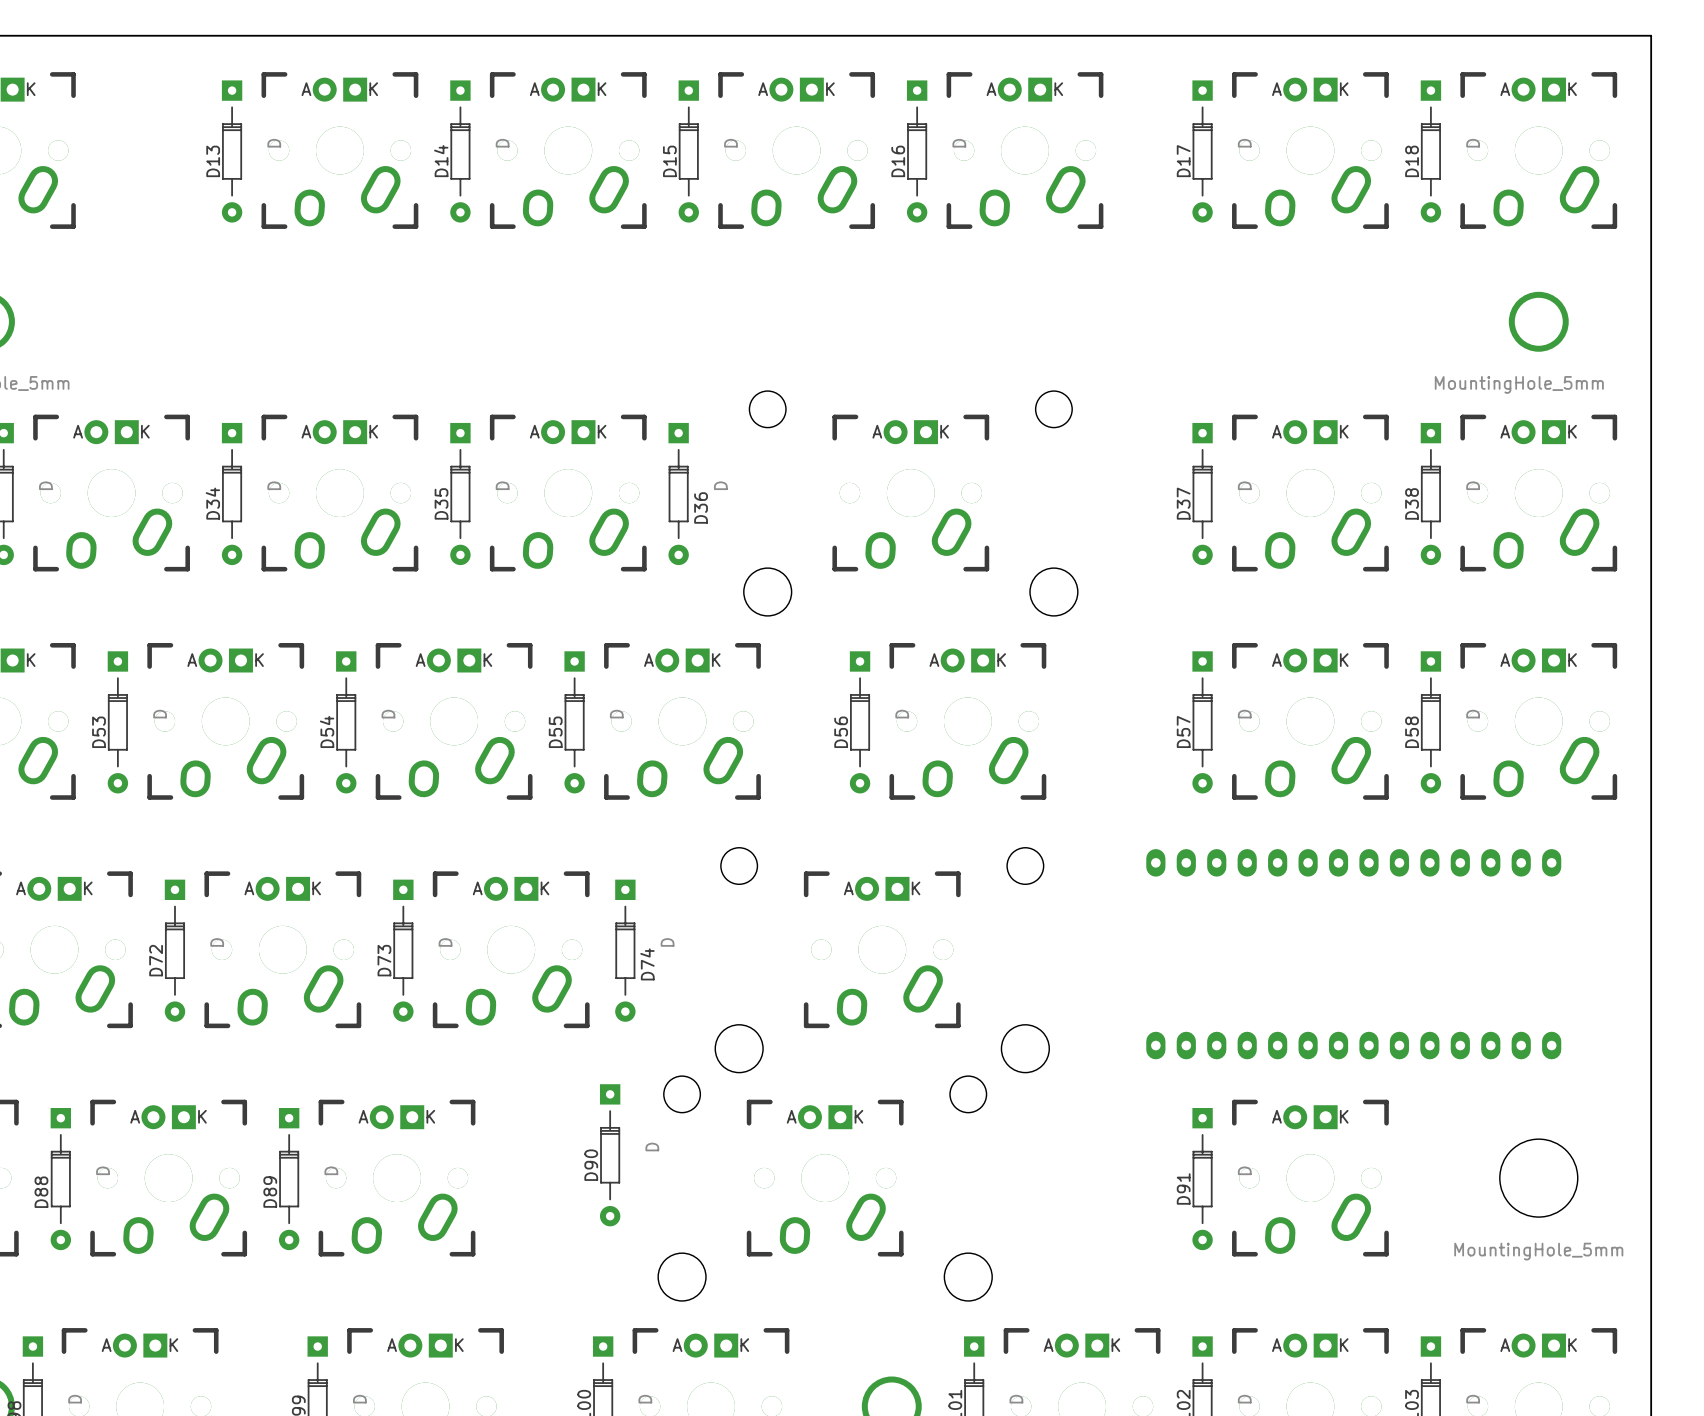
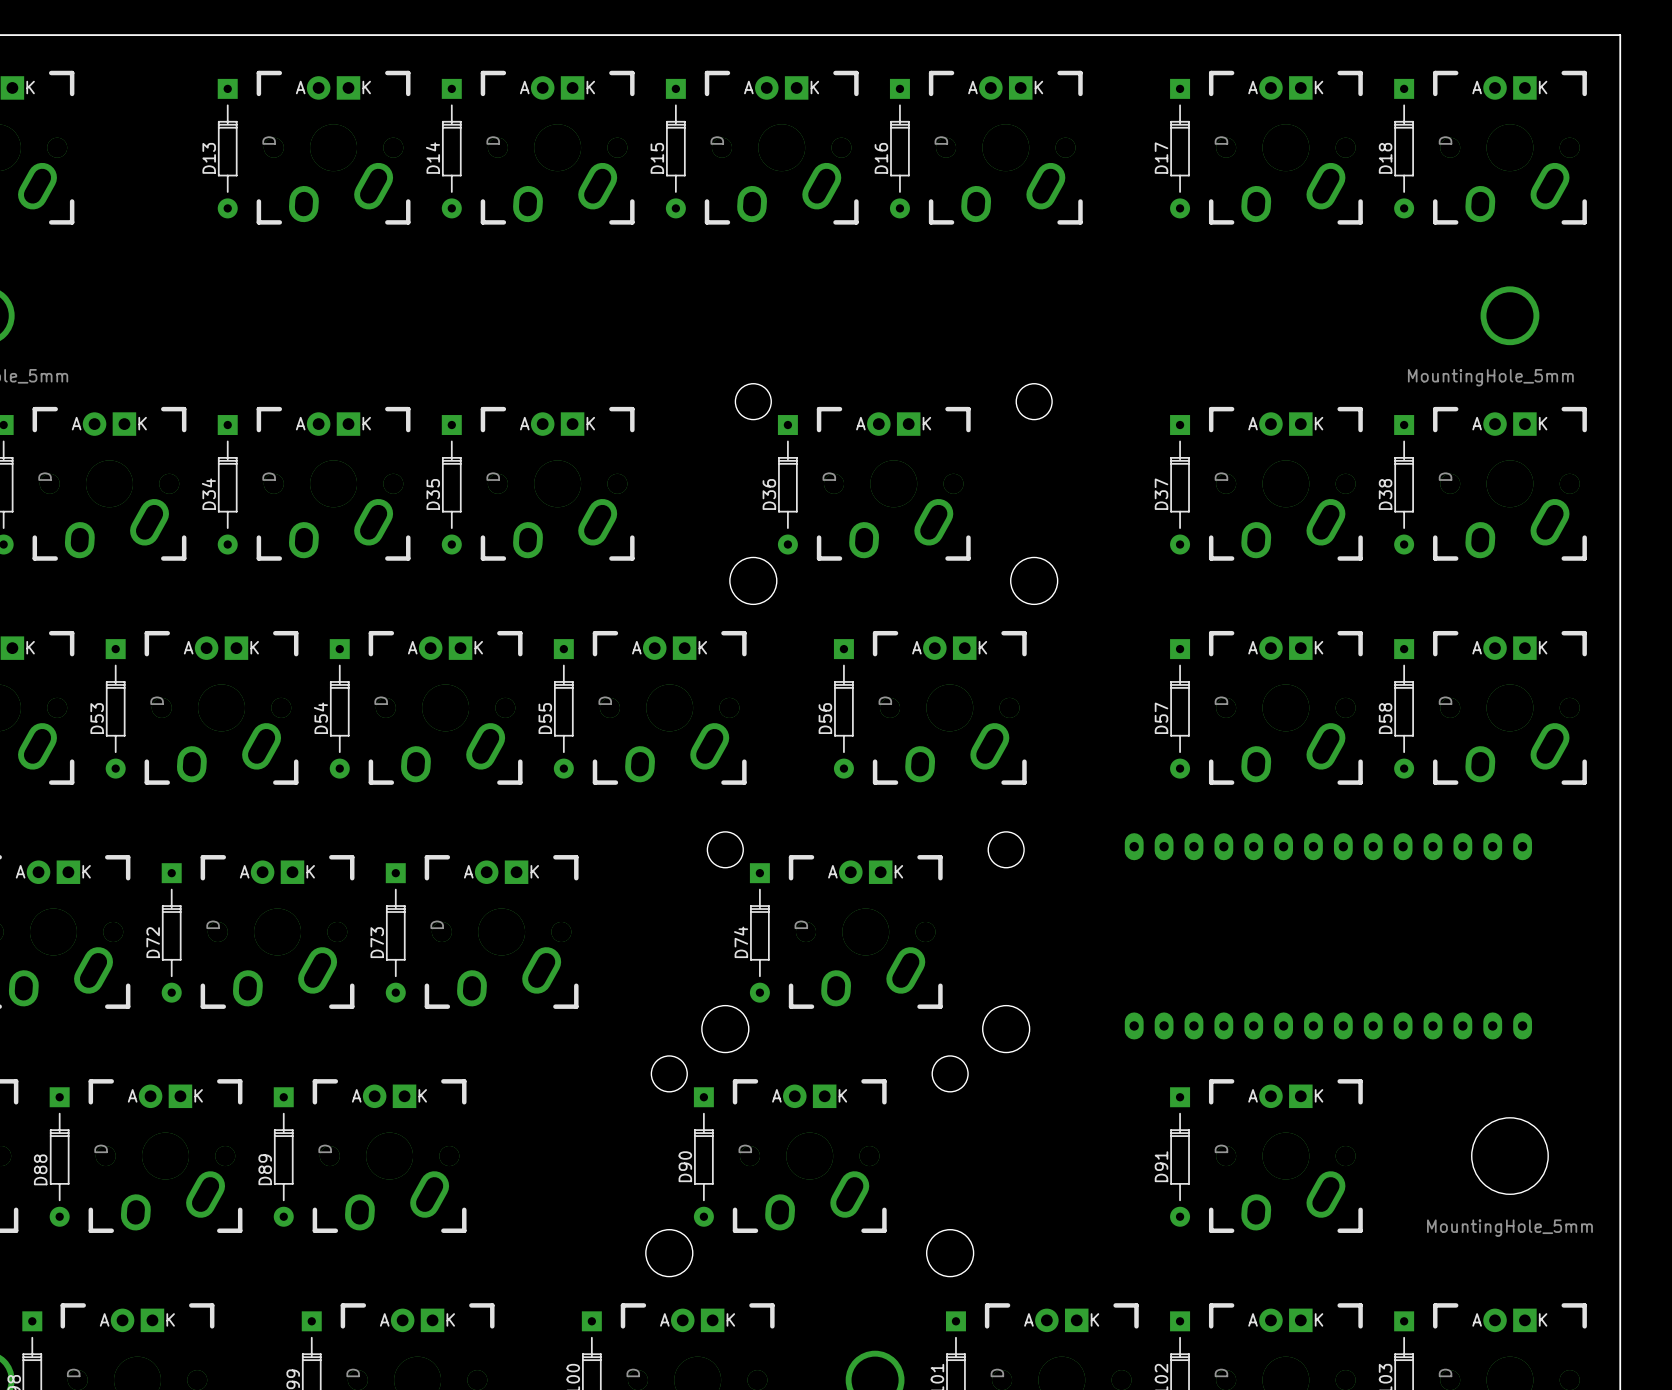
D36 position: (678, 494) -> (787, 484)
D36 name position: D36 (701, 507) -> D36 (769, 494)
D74 position: (625, 950) -> (759, 932)
D74 name position: D74 (647, 964) -> D74 (741, 942)
D90 position: (610, 1155) -> (703, 1156)

